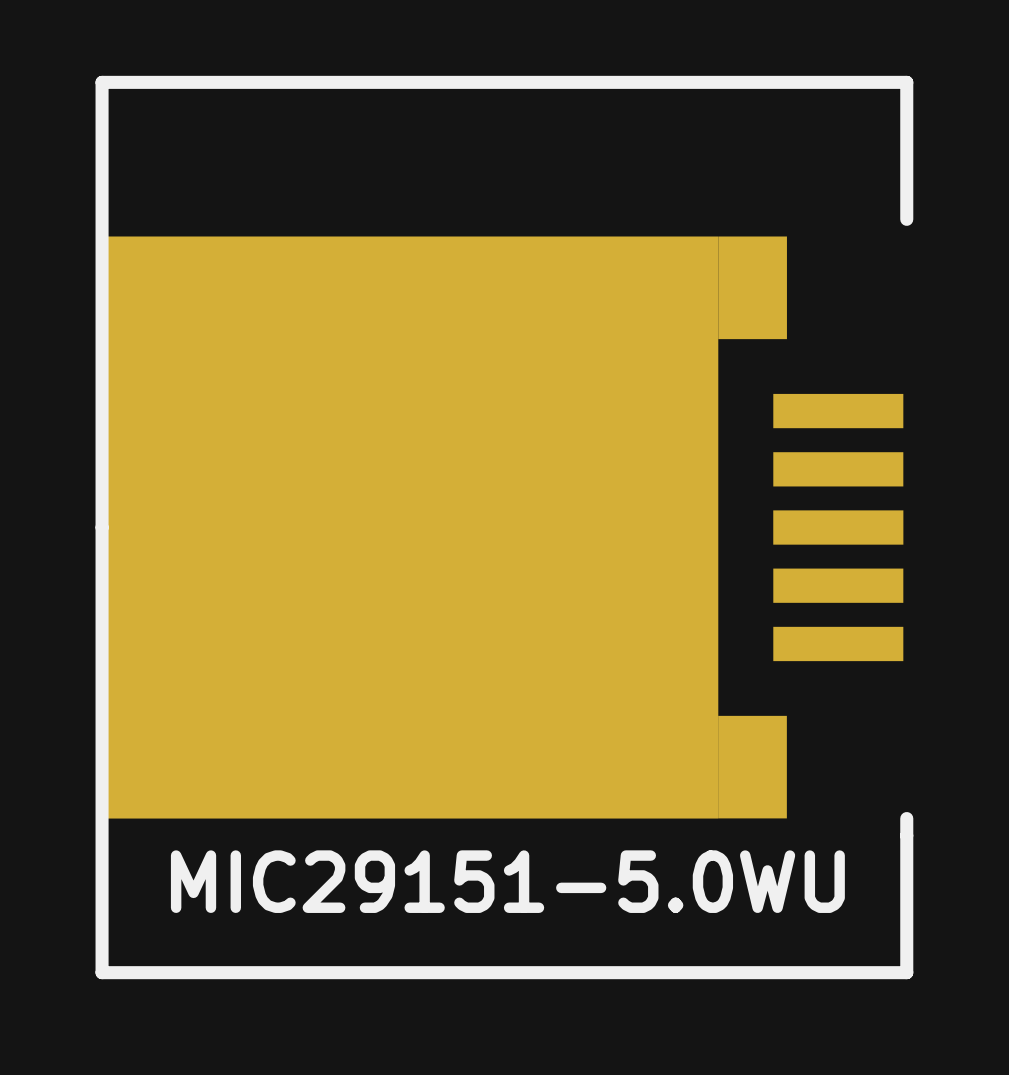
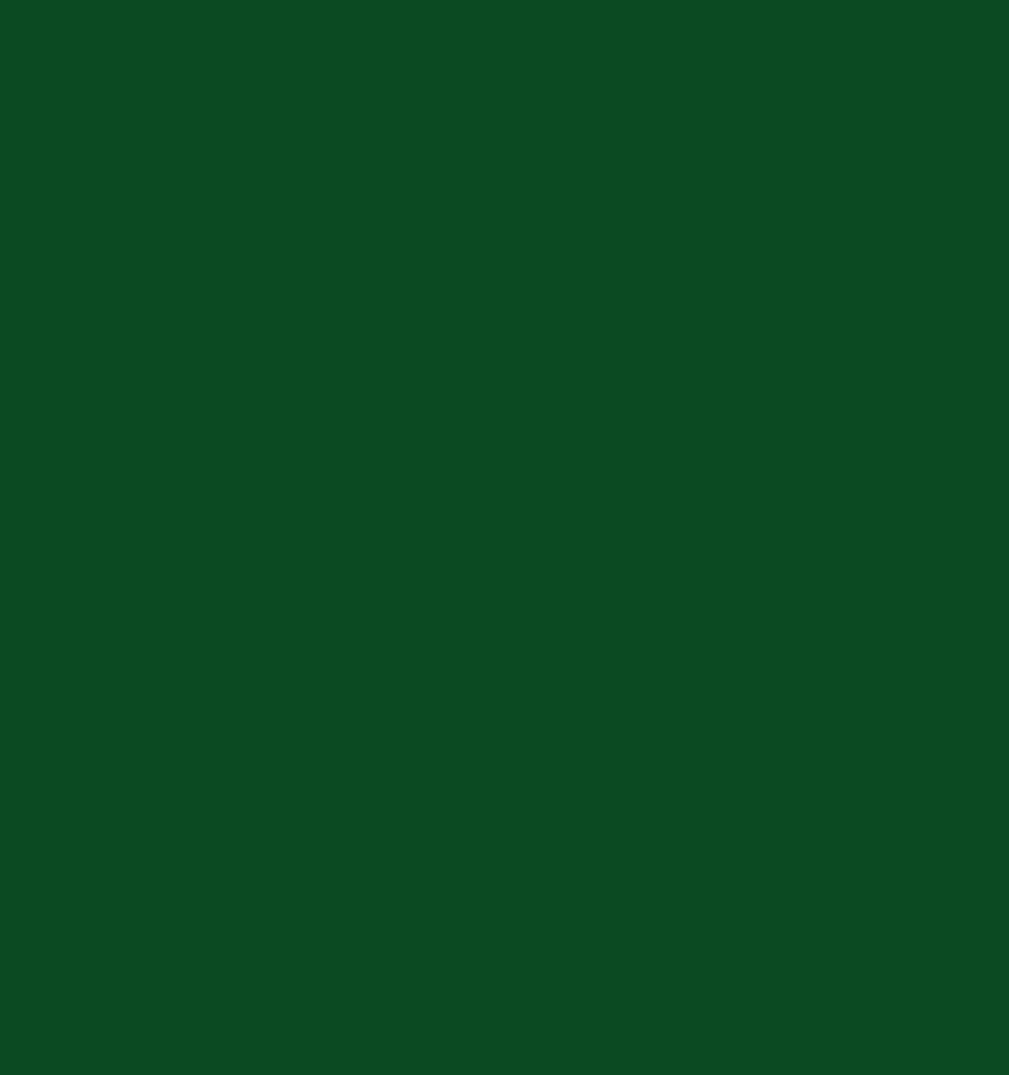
part: MIC29151-5.0WU (504, 527) -> none

